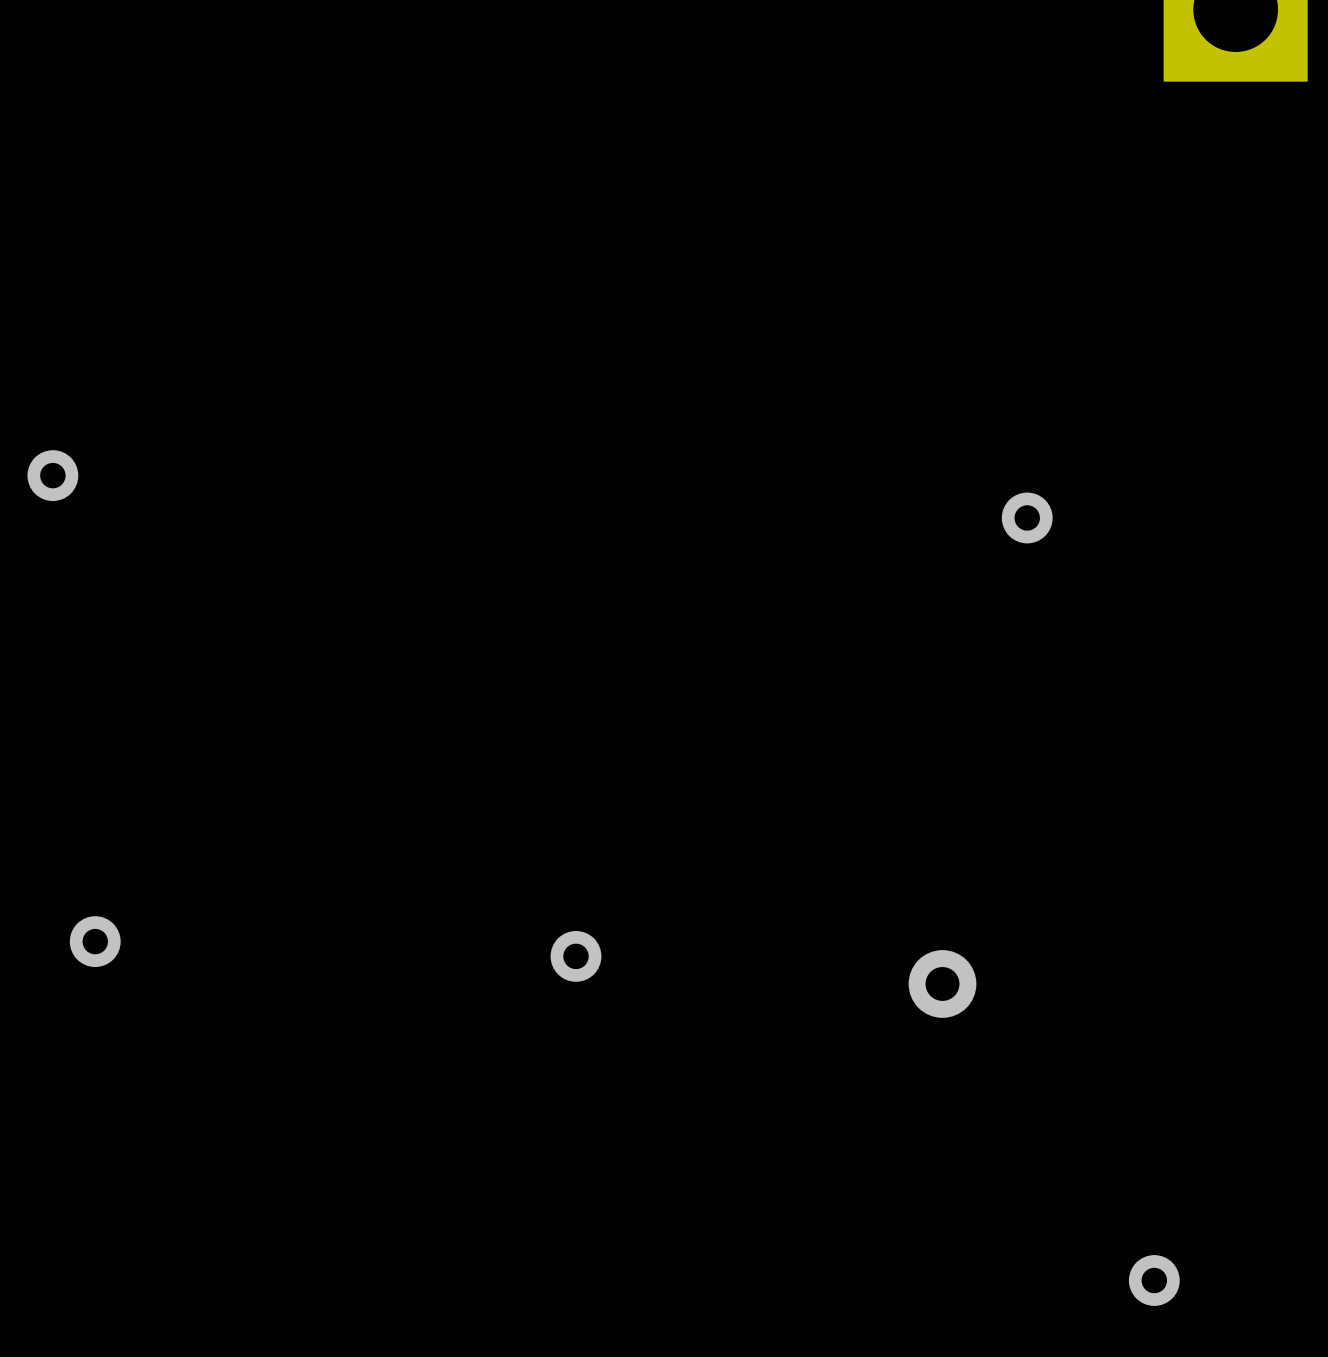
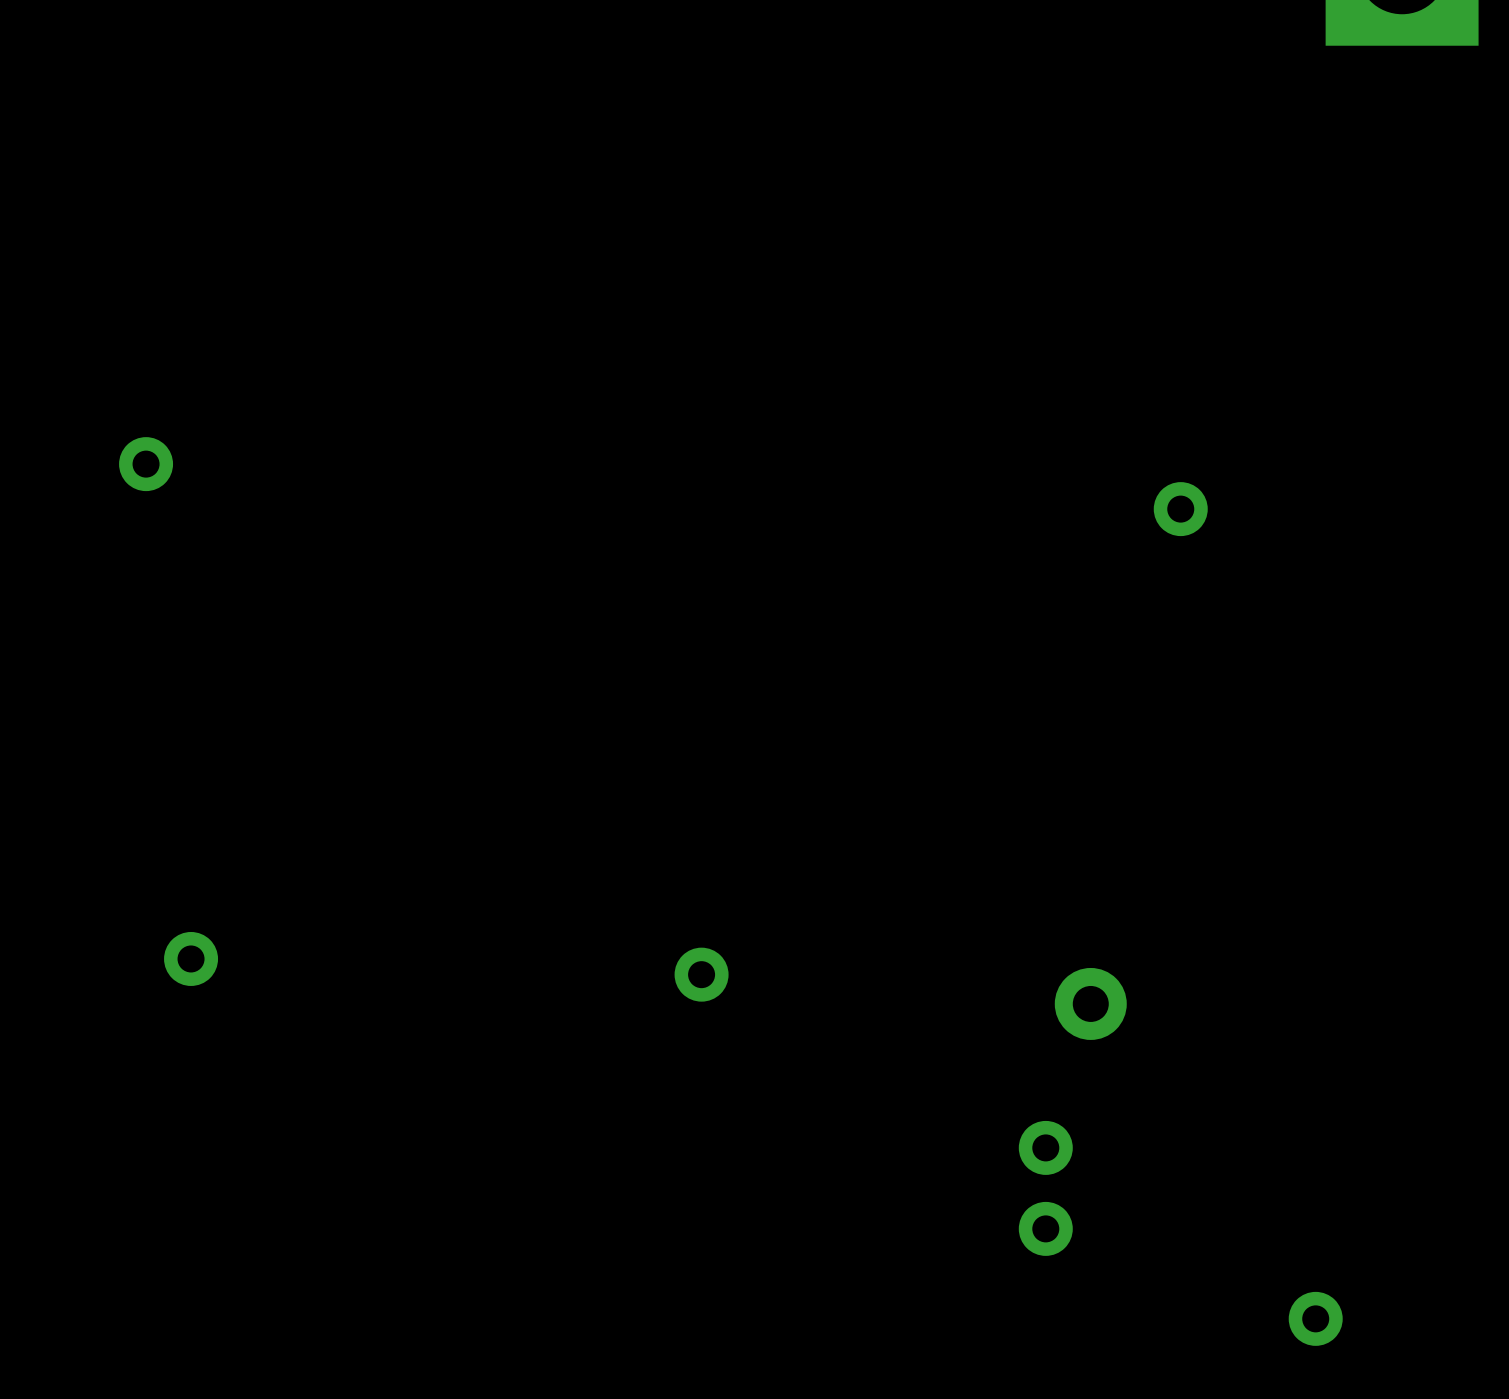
via: none -> (1045, 1147)
via: none -> (1045, 1228)

